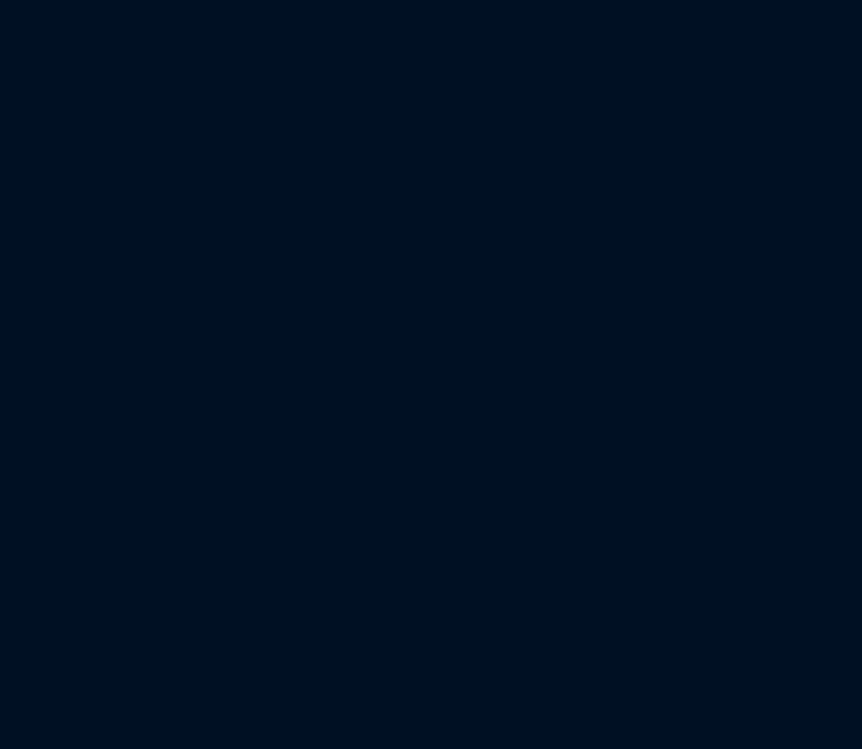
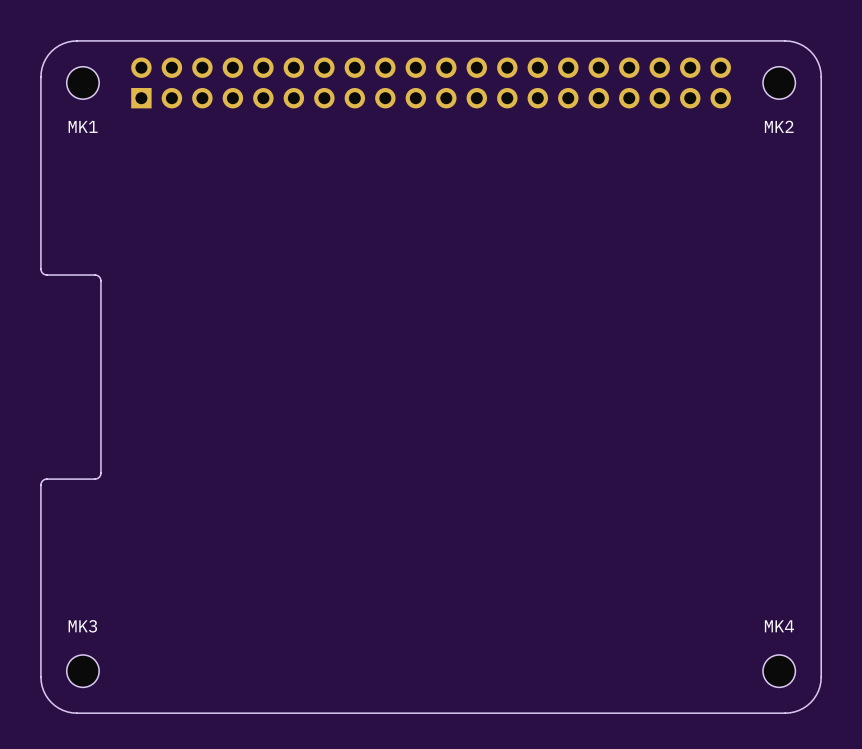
board edge: none -> (76, 40) (785, 40) (798, 43) (810, 51) (818, 63) (821, 76) (821, 677) (818, 690) (810, 702) (798, 710) (785, 713) (76, 713) (63, 710) (51, 702) (43, 690) (40, 677) (41, 483) (46, 479) (95, 479) (100, 473) (100, 279) (95, 275) (46, 274) (40, 269) (41, 72) (45, 58) (55, 48) (63, 43) (76, 40)
MK1: none -> (82, 82)
part: none -> (431, 82)
MK2: none -> (779, 82)
MK3: none -> (82, 671)
MK4: none -> (779, 671)

